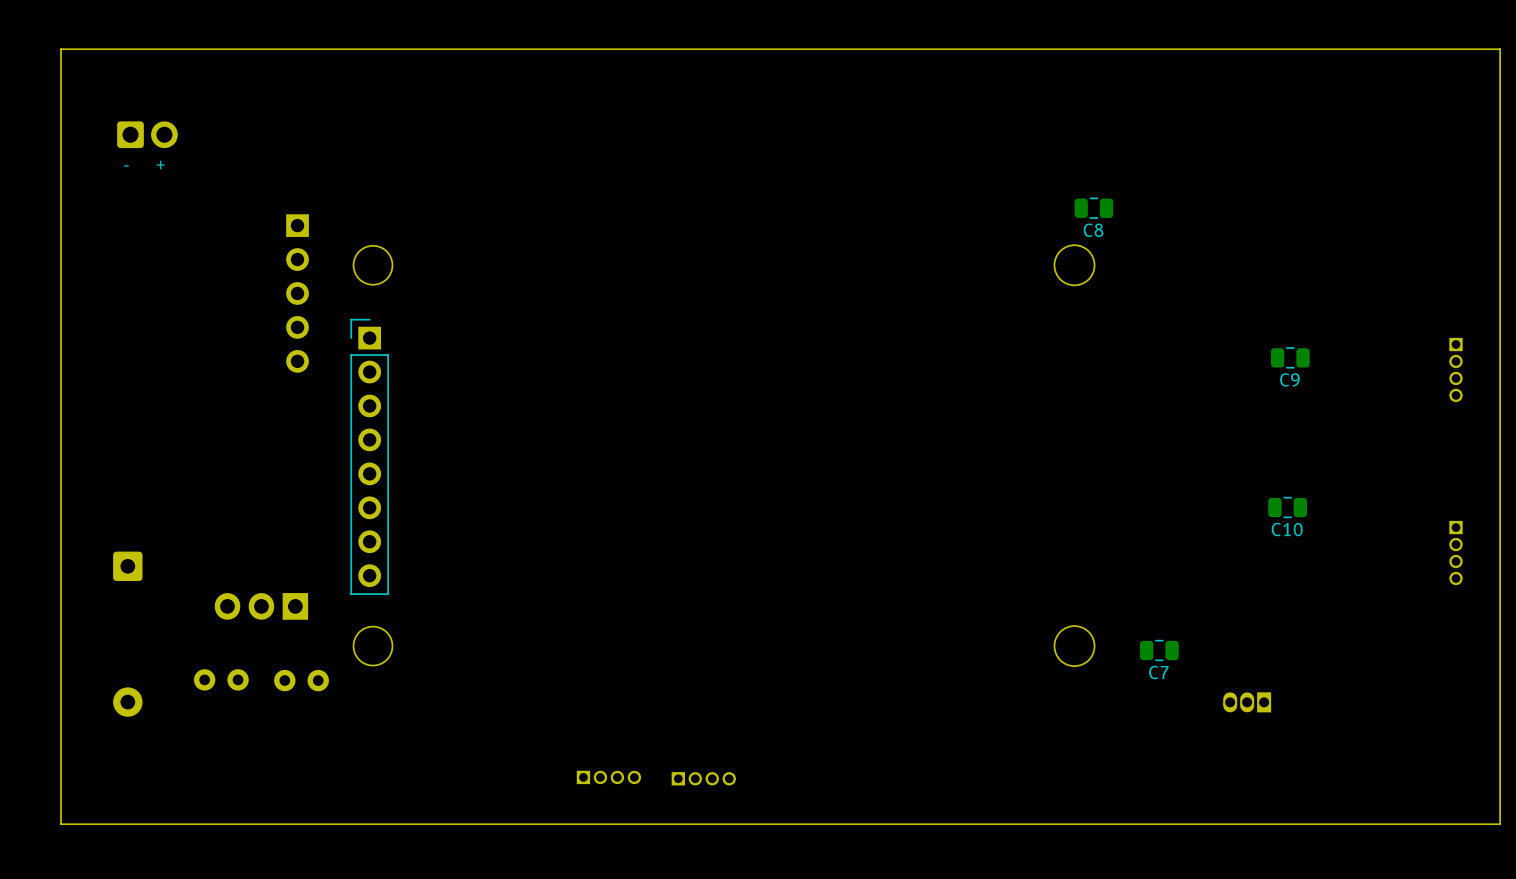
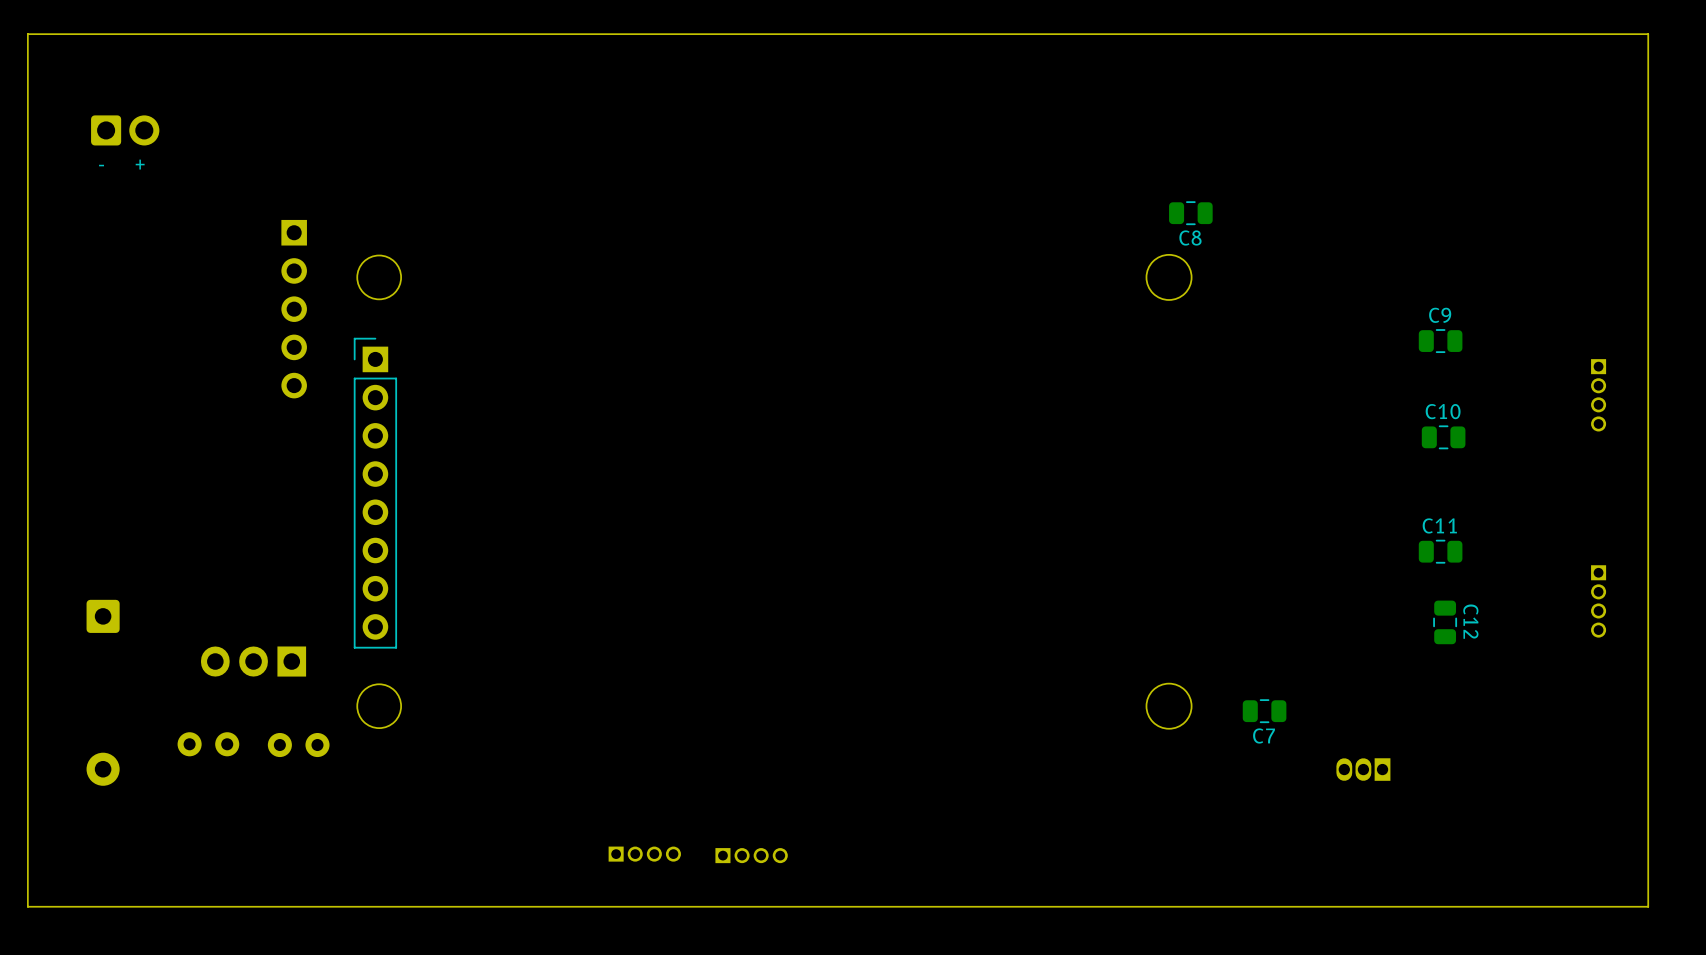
C9 position: (1290, 357) -> (1440, 341)
C9 name position: C9 (1289, 379) -> C9 (1440, 315)
C10 position: (1287, 507) -> (1443, 437)
C11: none -> (1440, 551)
C10 name position: C10 (1287, 529) -> C10 (1443, 411)
C12: none -> (1445, 622)

